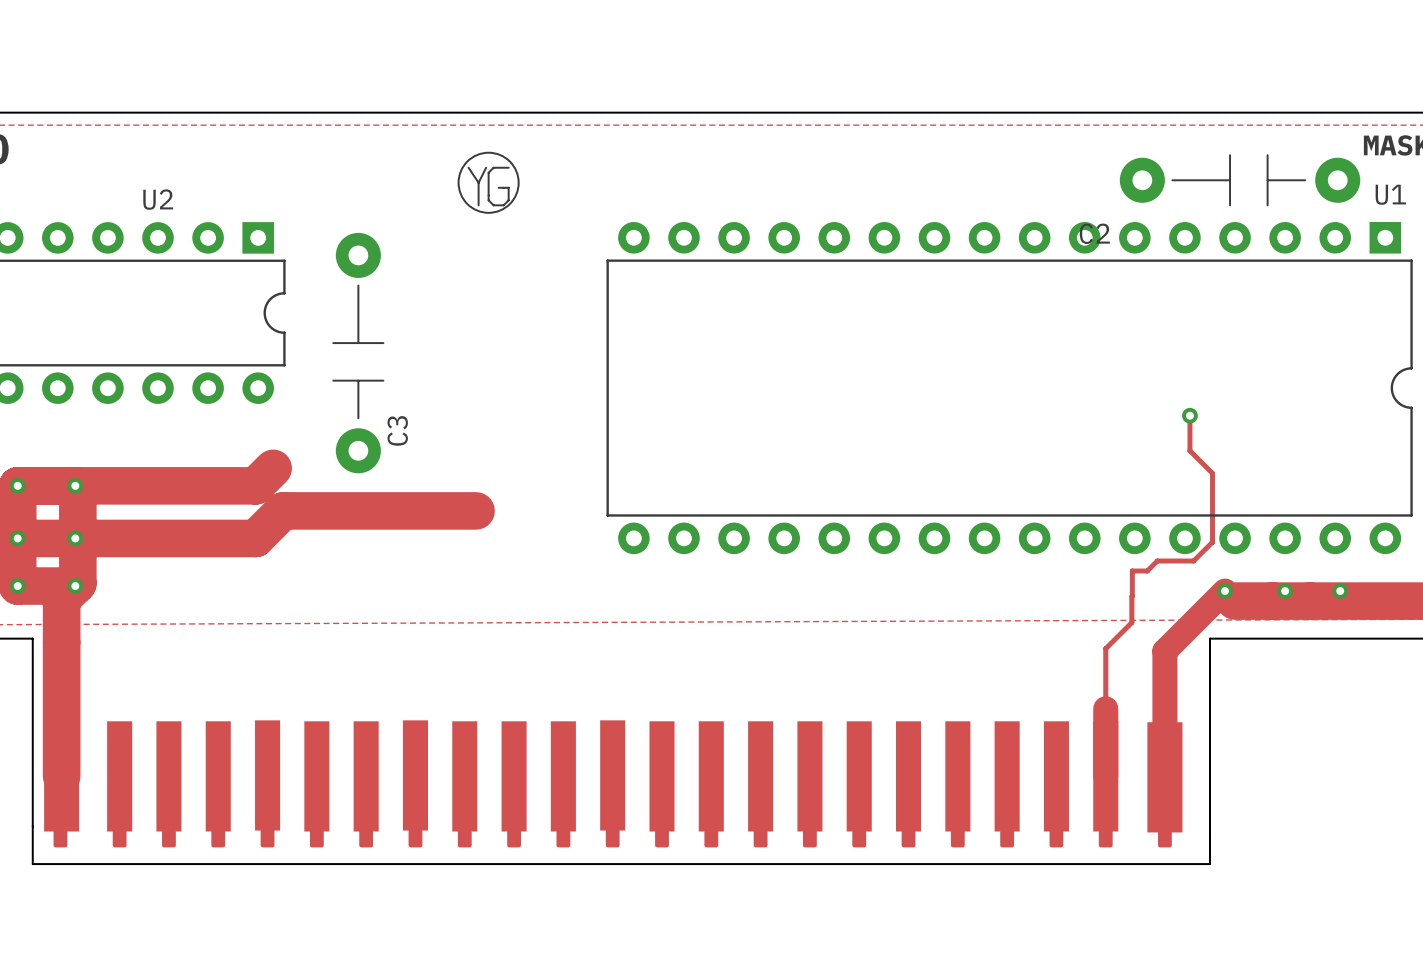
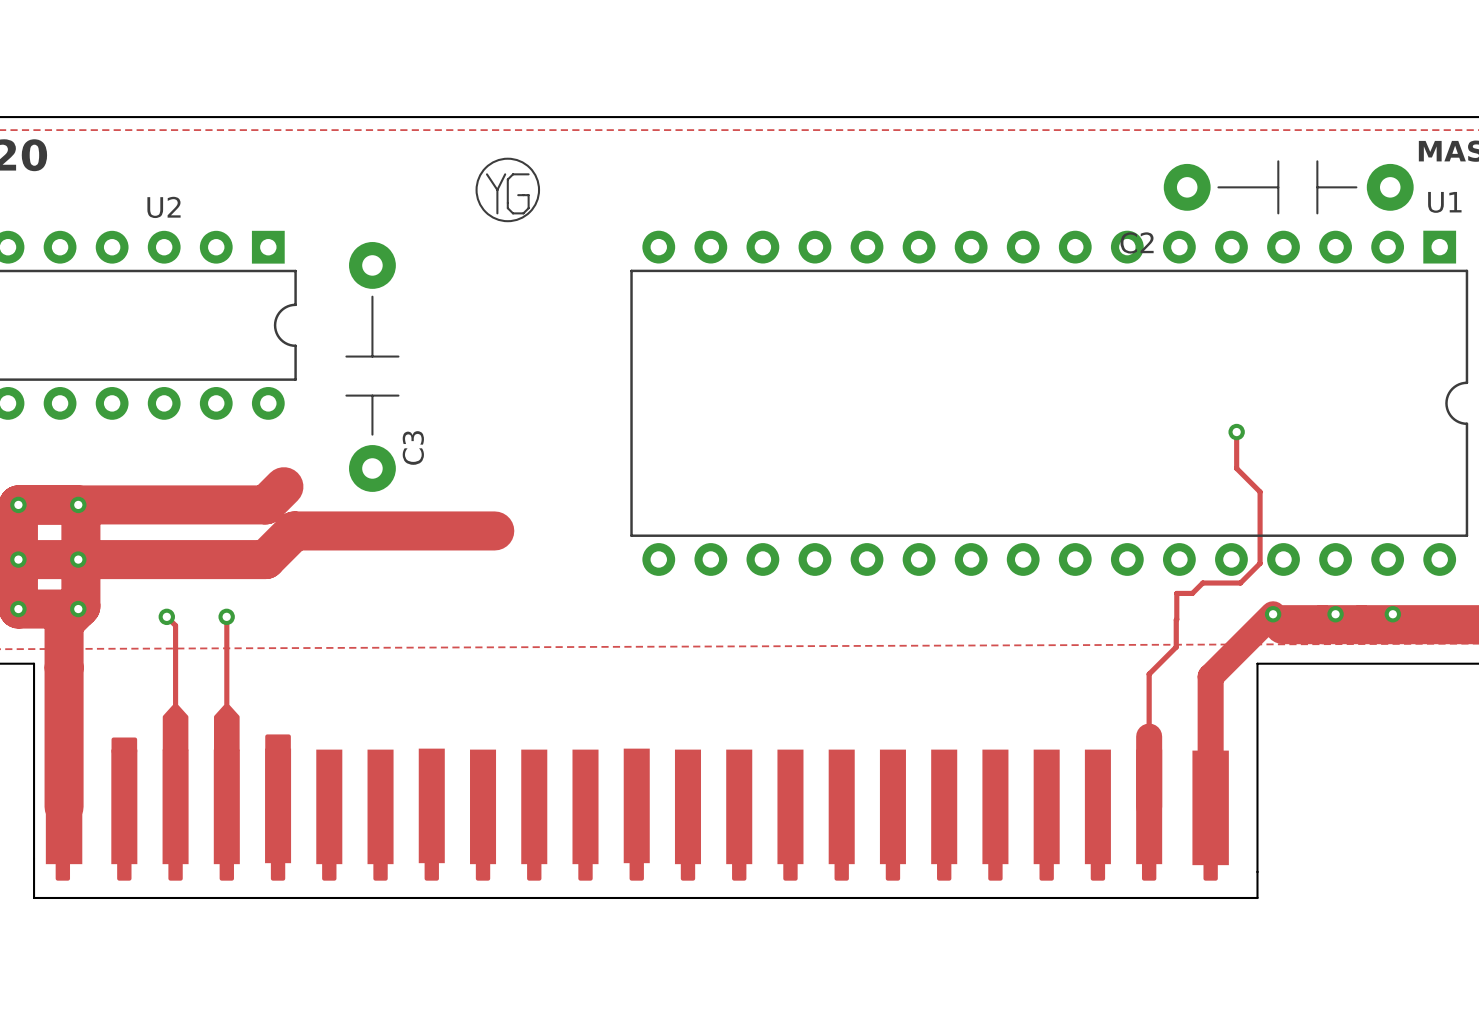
track: none -> (166, 616) (175, 625) (175, 806)
via: none -> (166, 616)
track: none -> (226, 617) (226, 806)
via: none -> (226, 616)
drawing: none -> [162, 704, 189, 752]
drawing: none -> [214, 704, 240, 752]
drawing: none -> [265, 734, 291, 751]
drawing: none -> [111, 737, 138, 754]

